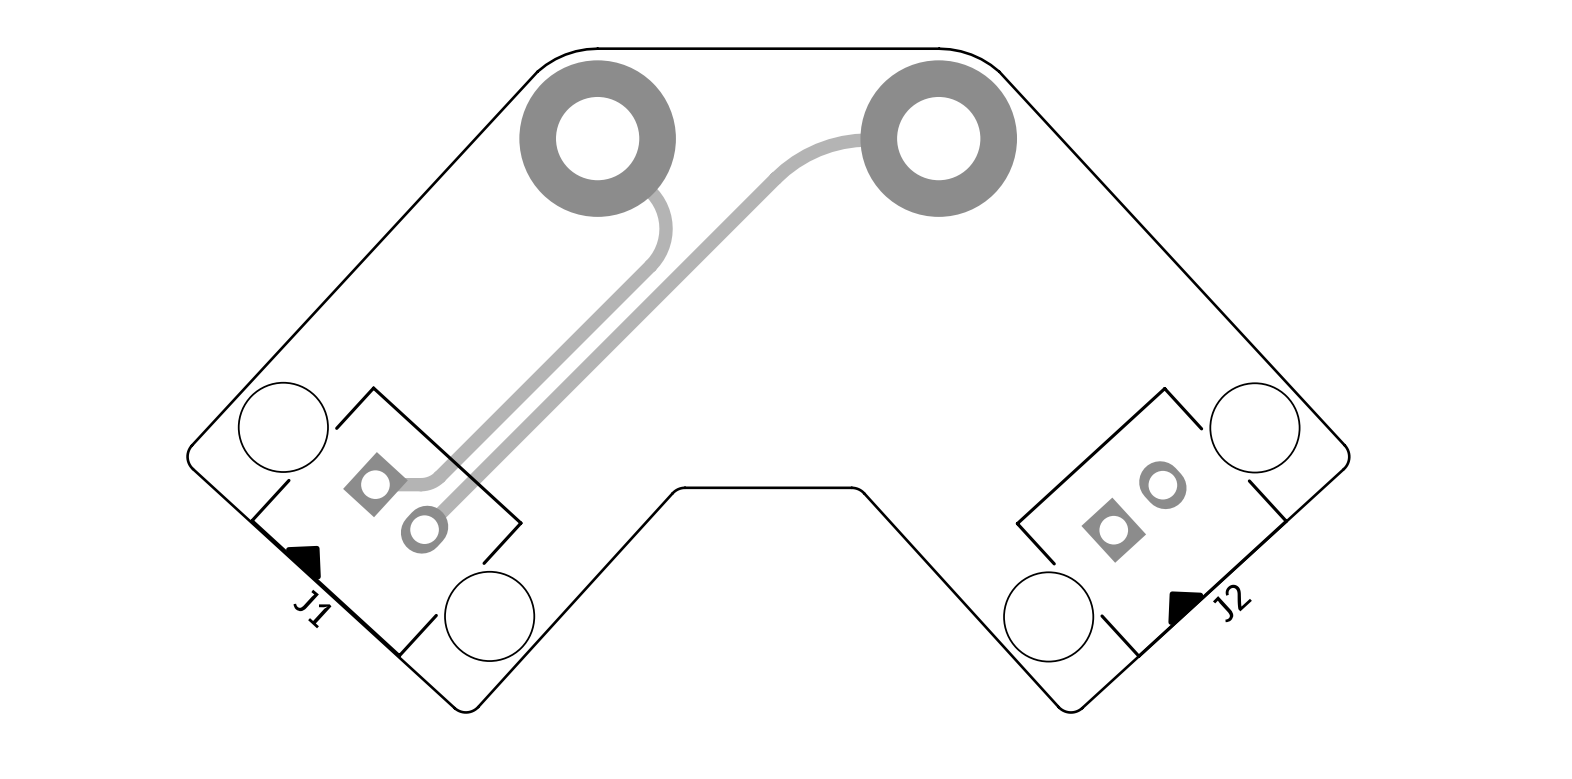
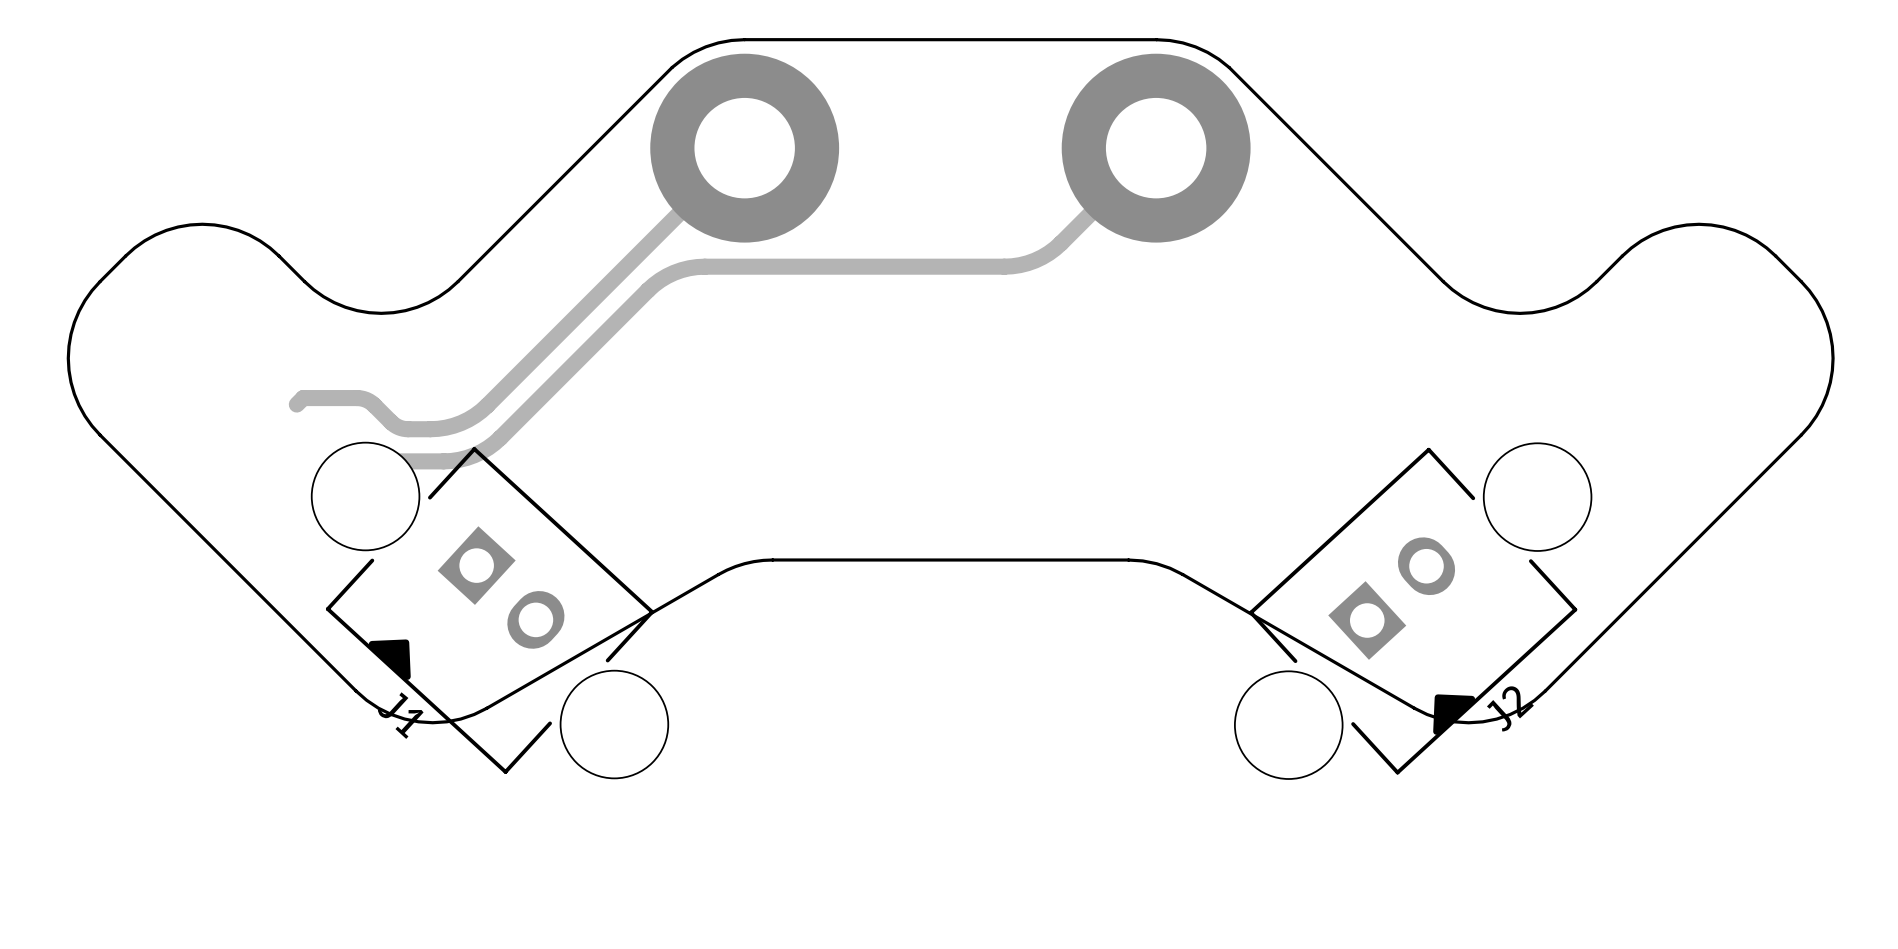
board edge: (999, 71) (1344, 445) (1349, 455) (1348, 462) (1343, 469) (1082, 708) (1072, 712) (1064, 711) (1058, 707) (864, 493) (851, 487) (685, 487) (676, 490) (478, 707) (470, 711) (461, 711) (454, 708) (191, 467) (187, 455) (191, 445) (537, 71) -> (1229, 67) (1443, 281) (1462, 296) (1484, 307) (1520, 313) (1555, 307) (1587, 289) (1622, 256) (1641, 240) (1674, 227) (1699, 224) (1723, 227) (1756, 240) (1775, 256) (1801, 281) (1822, 311) (1832, 346) (1832, 370) (1826, 394) (1809, 425) (1534, 700) (1510, 714) (1482, 721) (1454, 721) (1427, 714) (1182, 574) (1156, 563) (1142, 560) (772, 559) (744, 563) (726, 570) (474, 714) (446, 721) (432, 722) (404, 719) (391, 714) (366, 700) (356, 690) (91, 425) (79, 405) (68, 370) (71, 334) (79, 311) (100, 281) (125, 256) (144, 240) (166, 230) (202, 224) (238, 230) (260, 240) (279, 256) (313, 289) (345, 307) (381, 313) (417, 307) (439, 296) (458, 281) (672, 67)
track: (597, 138) (650, 191) (660, 206) (666, 228) (663, 246) (658, 256) (437, 478) (423, 484) (375, 484) -> (744, 148) (487, 405) (468, 419) (446, 427) (405, 429) (394, 425) (371, 403) (363, 398) (303, 398) (296, 404)
track: (937, 139) (868, 139) (842, 142) (806, 155) (785, 169) (424, 529) -> (1154, 149) (1061, 243) (1048, 253) (1035, 260) (1020, 265) (1004, 266) (704, 266) (681, 270) (660, 280) (648, 290) (500, 437) (481, 451) (466, 457) (451, 460) (353, 461)

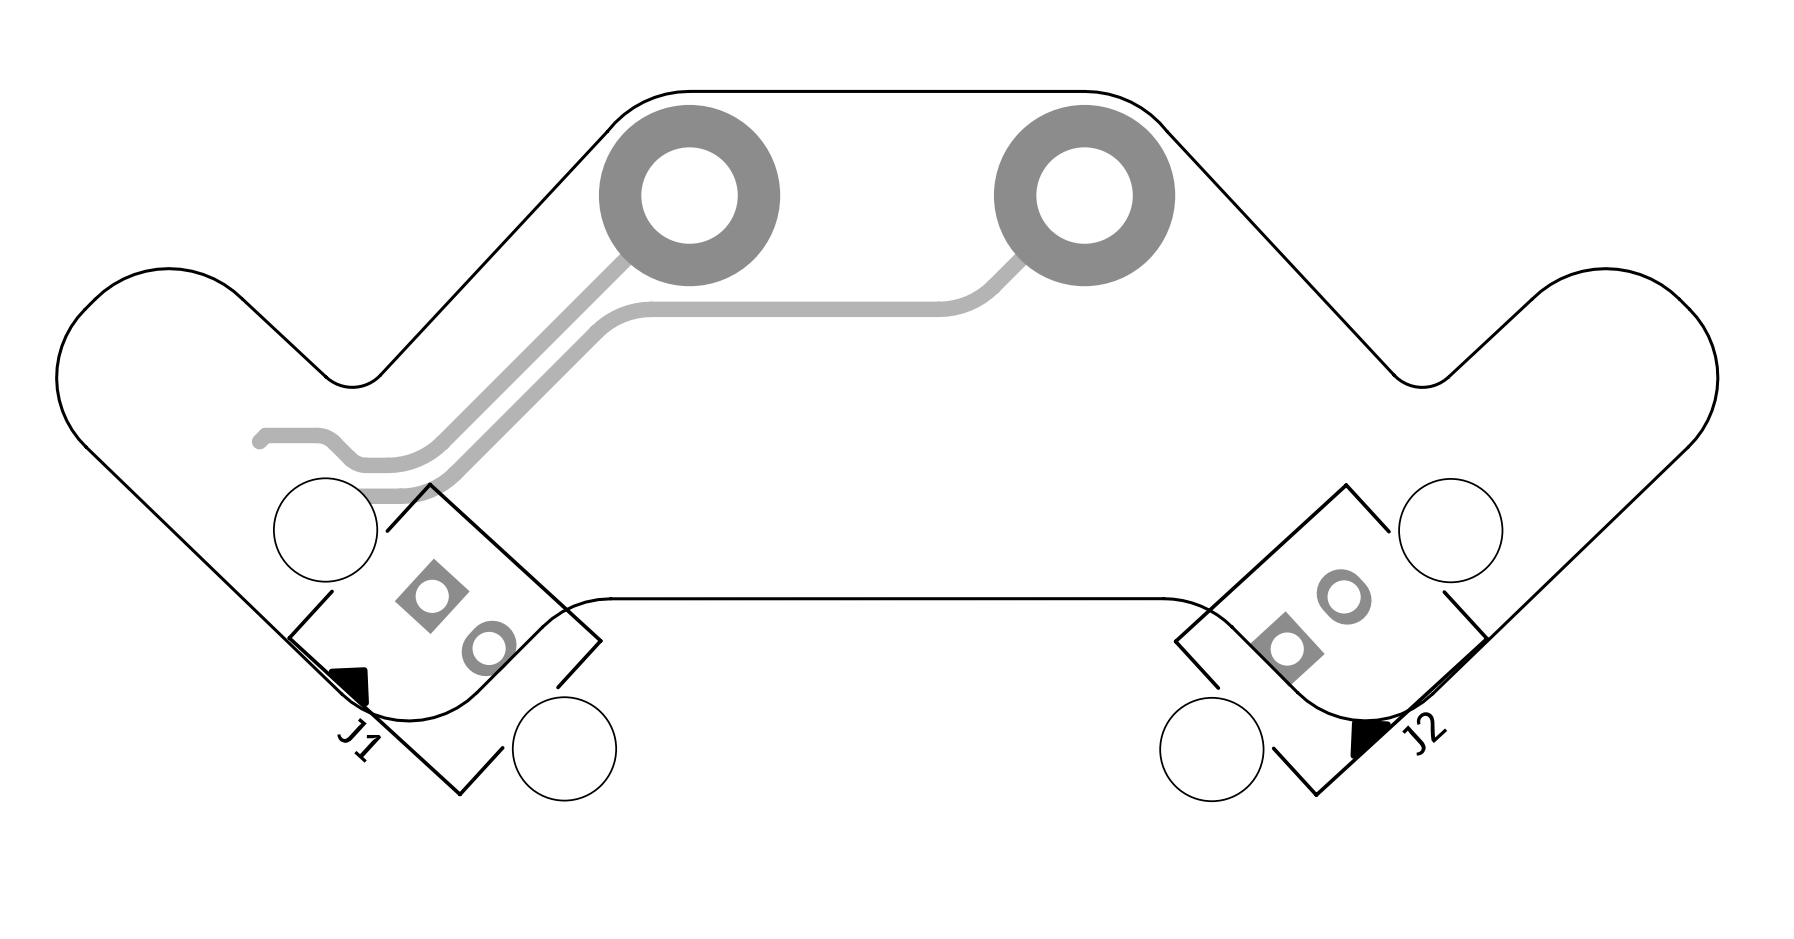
board edge: (744, 39) (718, 42) (705, 46) (682, 59) (672, 67) (458, 281) (428, 302) (393, 312) (369, 312) (345, 307) (313, 289) (279, 256) -> (689, 91) (654, 97) (633, 107) (615, 122) (380, 375) (370, 382) (353, 387) (332, 382) (242, 299)
board edge: (1156, 39) (1182, 42) (1195, 46) (1218, 59) (1229, 67) (1443, 281) (1462, 296) (1484, 307) (1520, 313) (1544, 310) (1567, 302) (1587, 289) (1622, 256) (1641, 240) (1674, 227) (1699, 224) (1723, 227) (1756, 240) (1775, 256) -> (1085, 91) (1119, 97) (1150, 114) (1394, 375) (1410, 385) (1425, 387) (1444, 380) (1540, 291) (1571, 274) (1594, 269) (1628, 271) (1661, 284) (1679, 299)
board edge: (1786, 266) (1816, 300) (1830, 334) (1833, 358) (1830, 382) (1816, 416) (1801, 435) (1545, 691) (1534, 700) (1510, 714) (1496, 719) (1468, 722) (1440, 719) (1427, 714) (1182, 574) (1156, 563) (1128, 560) (772, 559) (753, 561) (735, 566) (718, 574) (474, 714) (446, 721) (432, 722) (404, 719) (378, 708) (356, 690) (100, 435) (84, 416) (71, 382) (68, 358) (71, 334) (84, 300) (114, 266) -> (1689, 309) (1703, 326) (1712, 346) (1717, 378) (1712, 410) (1695, 438) (1432, 693) (1412, 708) (1389, 717) (1377, 720) (1352, 719) (1328, 713) (1317, 707) (1297, 692) (1224, 620) (1209, 610) (1182, 600) (1163, 598) (610, 598) (585, 602) (562, 611) (542, 627) (467, 700) (445, 713) (421, 720) (409, 720) (397, 720) (372, 714) (351, 701) (341, 693) (78, 439) (62, 410) (57, 389) (57, 367) (66, 336) (84, 309)

